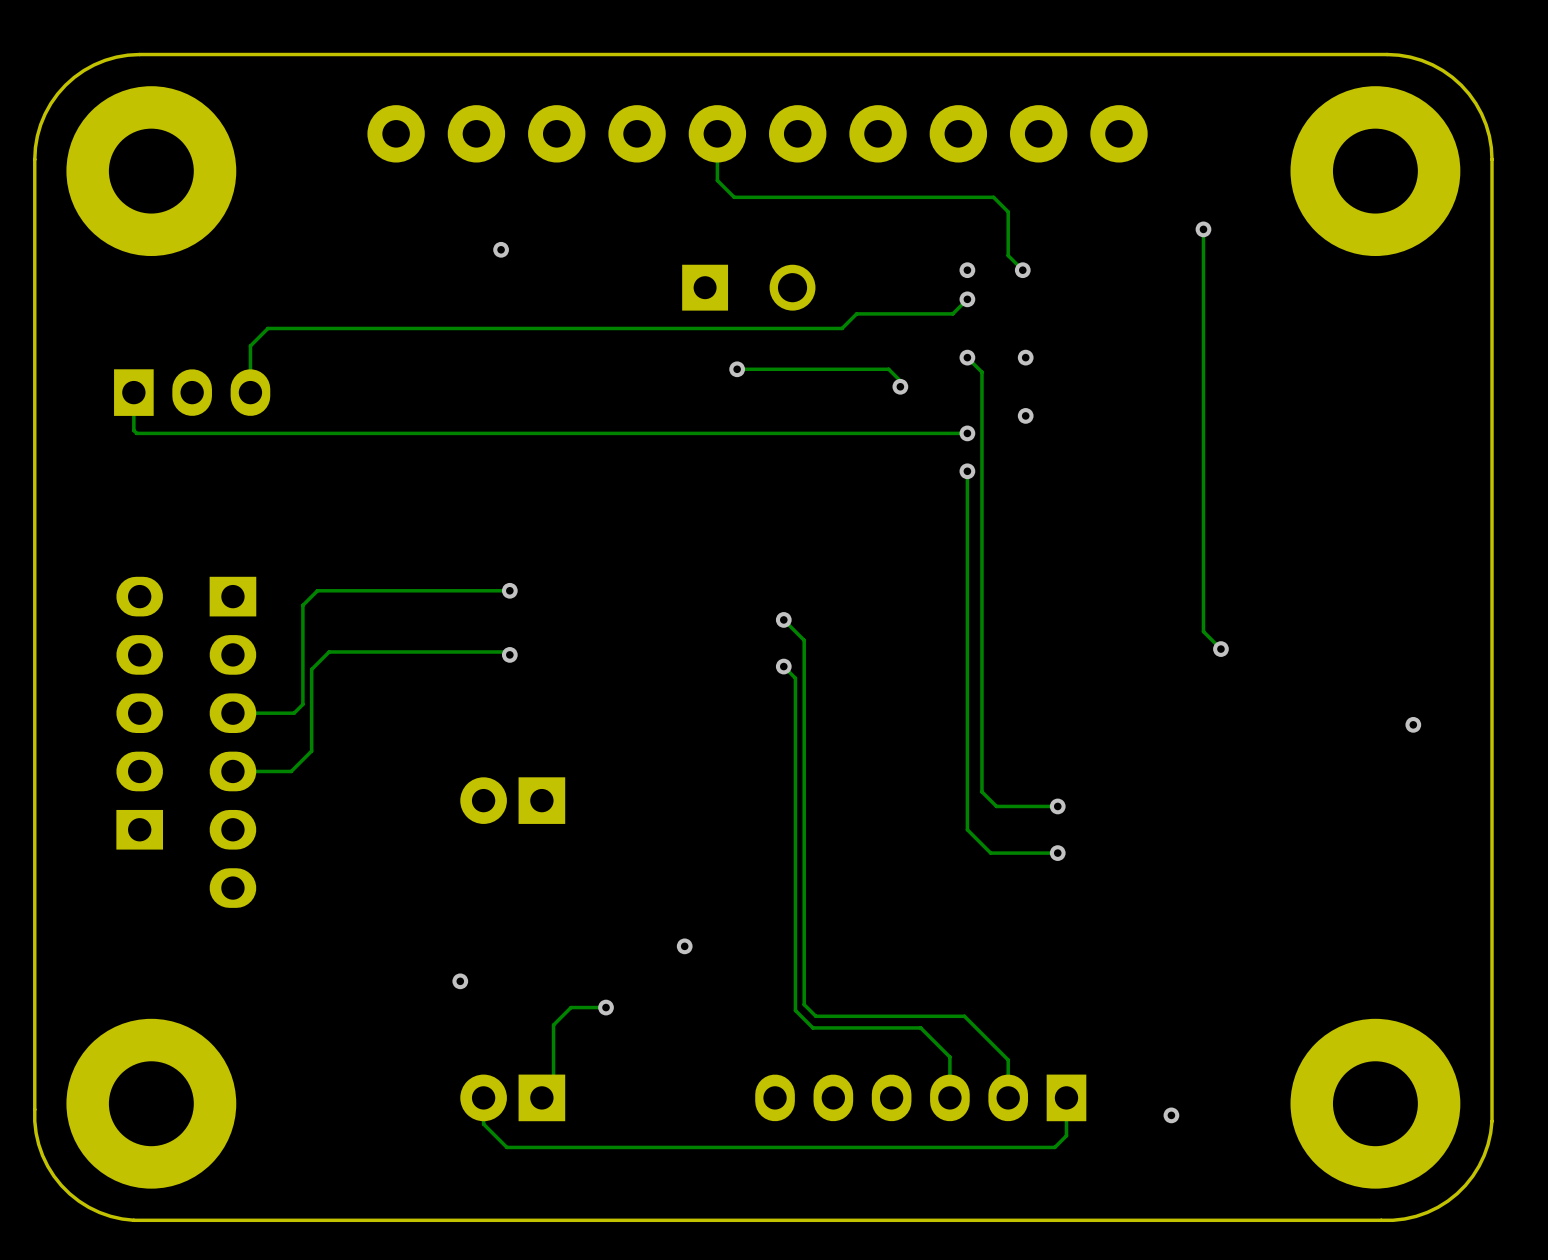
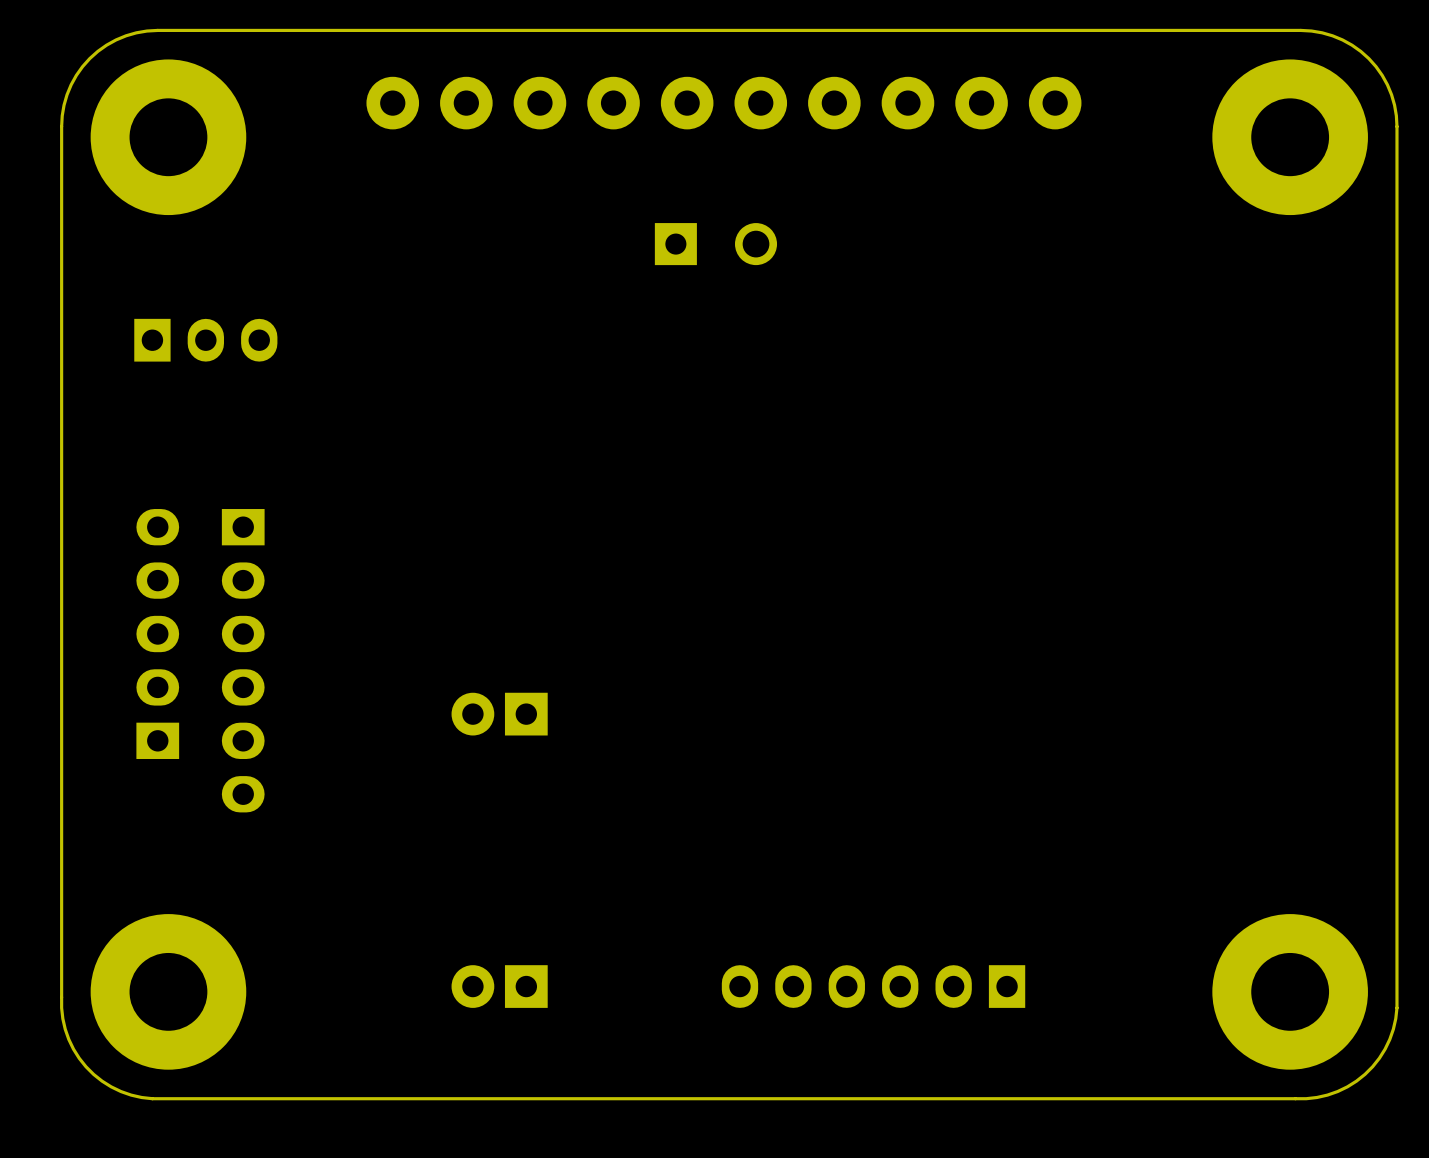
track: (717, 133) (717, 180) (734, 197) (993, 197) (1008, 211) (1008, 255) (1022, 270) -> none
track: (1203, 229) (1203, 631) (1220, 649) -> none
via: (1203, 229) -> none
via: (501, 249) -> none
via: (967, 270) -> none
via: (1022, 270) -> none
track: (967, 299) (952, 313) (856, 313) (842, 328) (267, 328) (250, 345) (250, 392) -> none
via: (967, 299) -> none
track: (967, 357) (981, 372) (981, 791) (996, 806) (1057, 806) -> none
via: (967, 357) -> none
via: (1025, 357) -> none
track: (737, 369) (888, 369) (900, 380) (900, 386) -> none
via: (737, 369) -> none
via: (900, 386) -> none
track: (133, 392) (133, 430) (136, 433) (967, 433) -> none
via: (1025, 415) -> none
via: (967, 433) -> none
track: (967, 471) (967, 829) (990, 853) (1057, 853) -> none
via: (967, 471) -> none
track: (509, 590) (317, 590) (302, 605) (302, 704) (294, 713) (232, 713) -> none
via: (509, 590) -> none
track: (783, 619) (804, 640) (804, 1004) (815, 1016) (964, 1016) (1008, 1060) (1008, 1097) -> none
via: (783, 619) -> none
via: (1220, 649) -> none
track: (509, 654) (506, 651) (329, 651) (311, 669) (311, 751) (291, 771) (232, 771) -> none
via: (509, 654) -> none
track: (783, 666) (795, 678) (795, 1010) (812, 1027) (920, 1027) (949, 1057) (949, 1097) -> none
via: (783, 666) -> none
via: (1413, 724) -> none
via: (1057, 806) -> none
via: (1057, 853) -> none
via: (684, 946) -> none
via: (460, 981) -> none
track: (606, 1007) (571, 1007) (553, 1025) (553, 1086) (541, 1097) -> none
via: (606, 1007) -> none
track: (1066, 1097) (1066, 1135) (1054, 1147) (506, 1147) (483, 1124) (483, 1097) -> none
via: (1171, 1115) -> none

